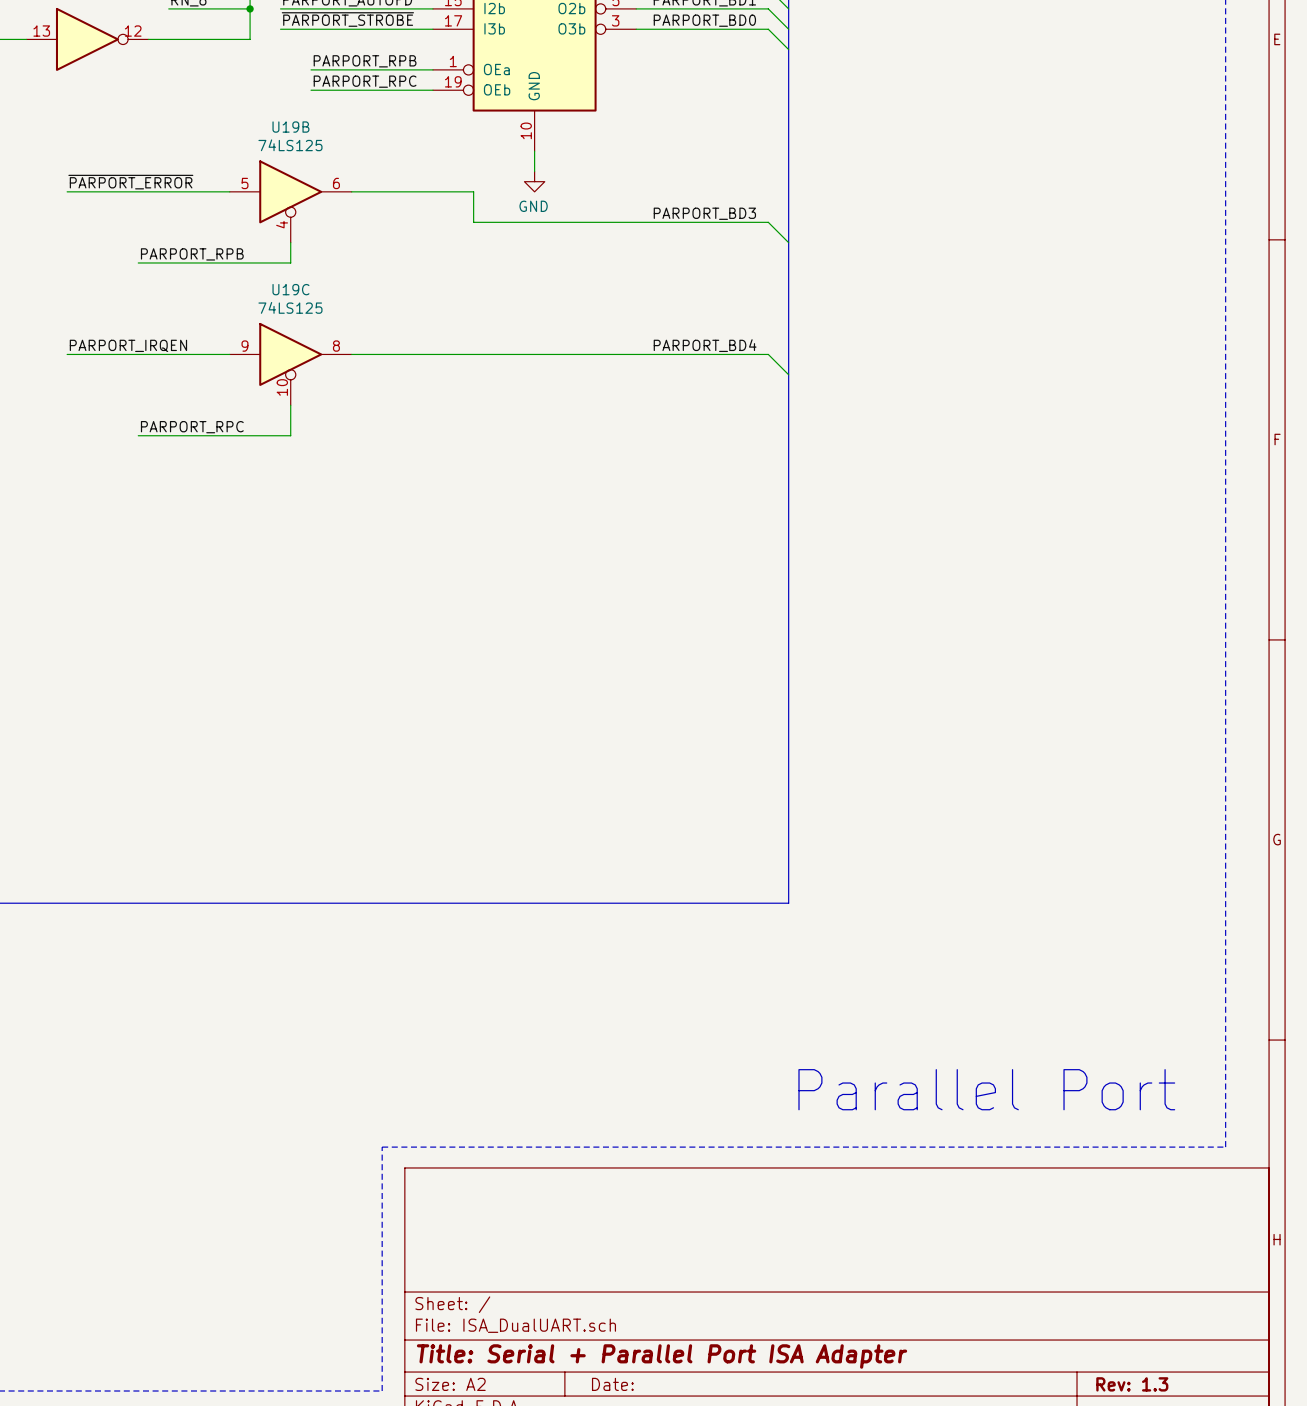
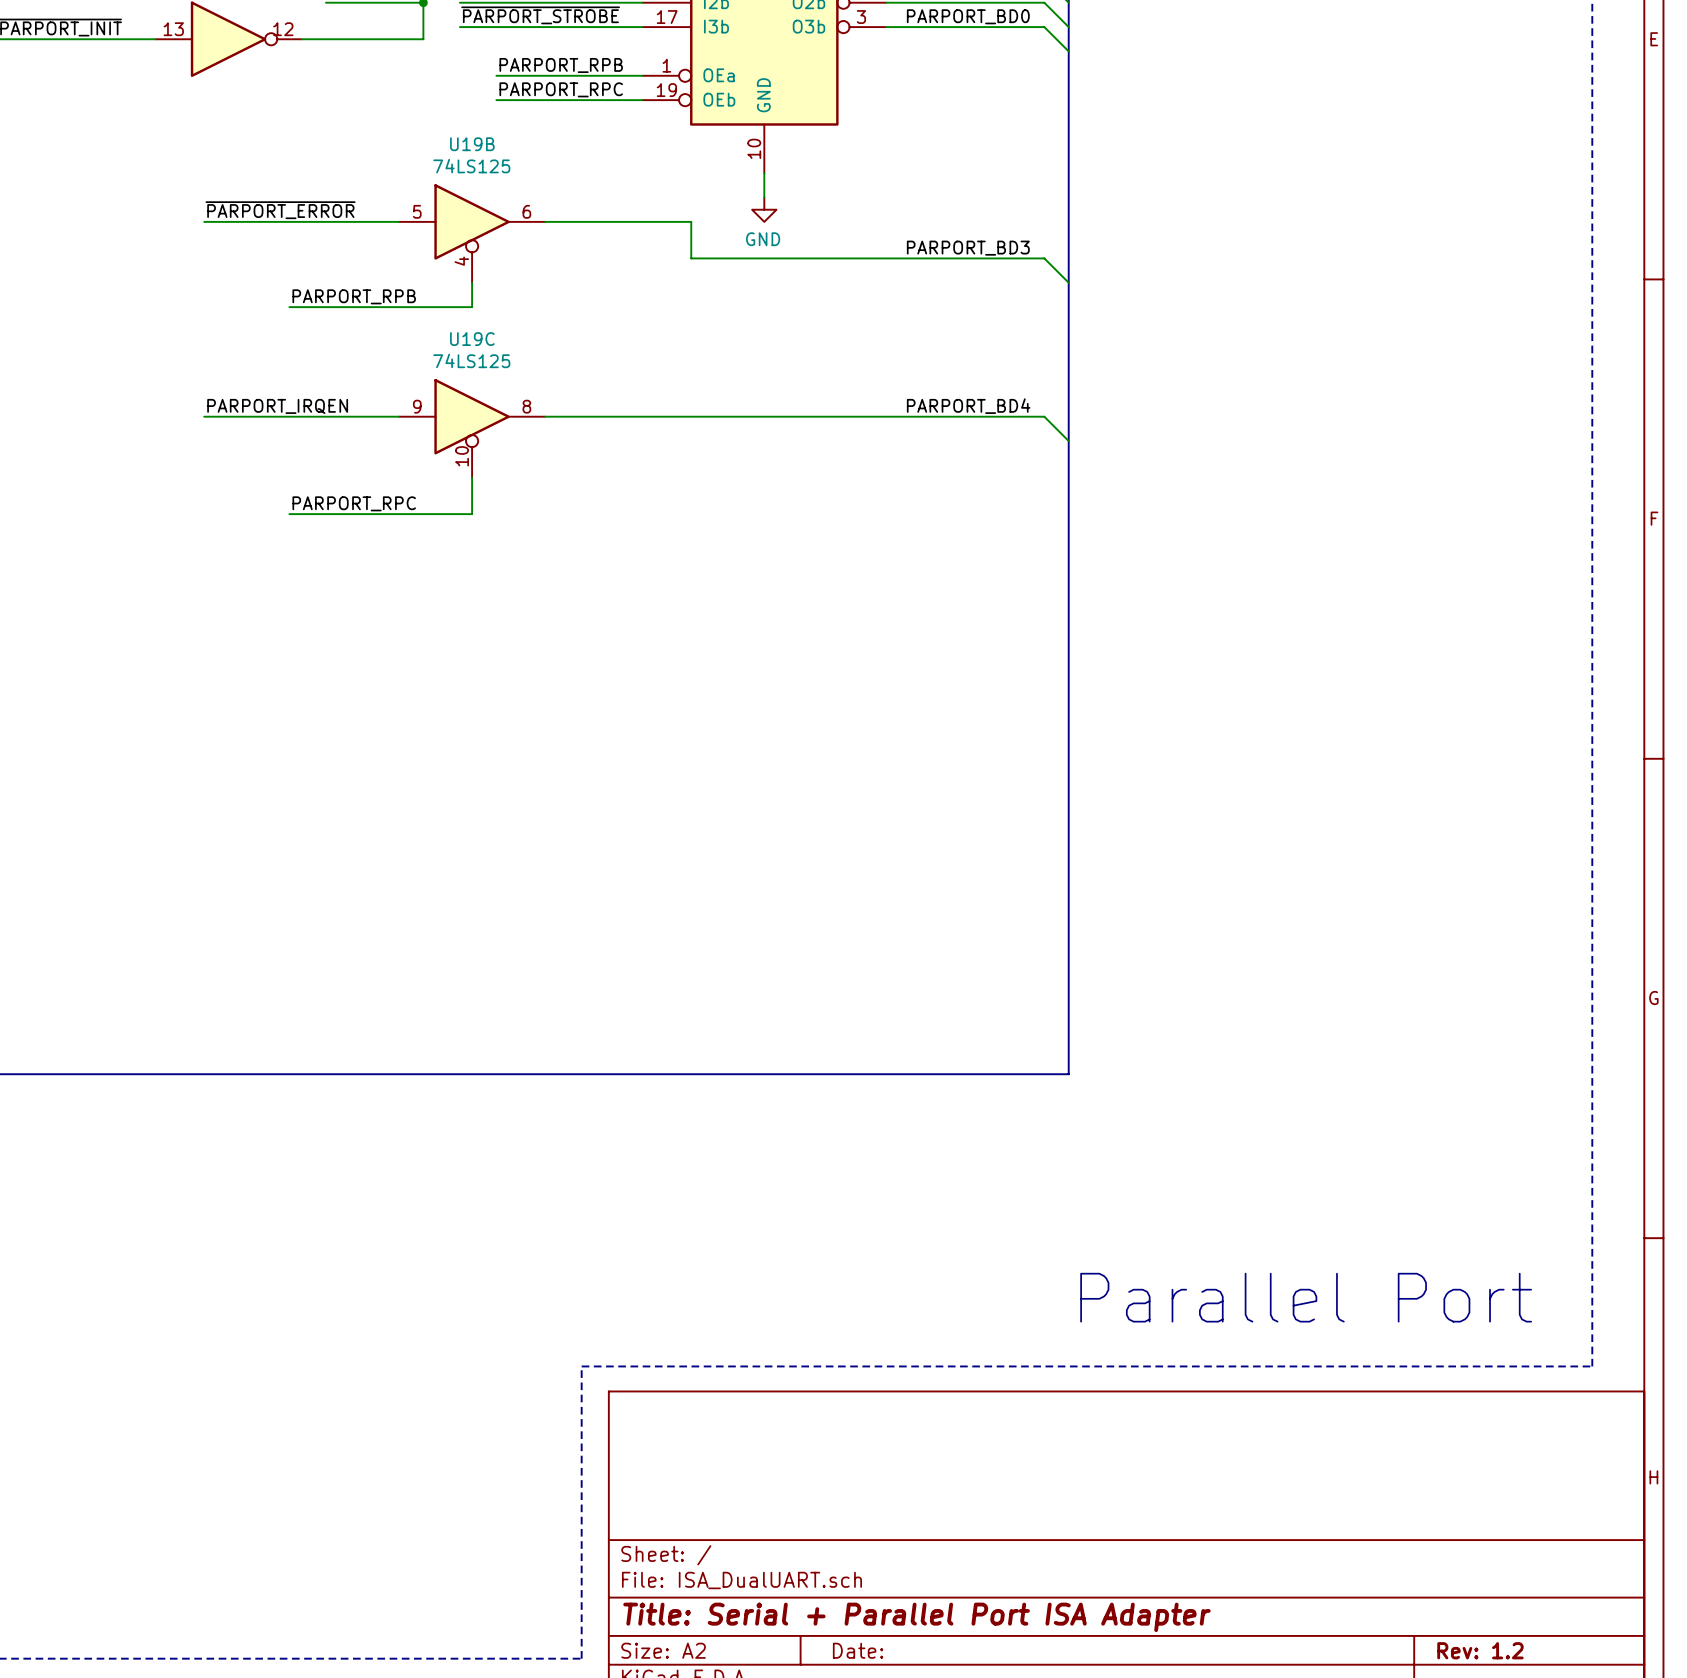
title block: Rev: 1.3 (1132, 1384) -> Rev: 1.2 (1480, 1650)

